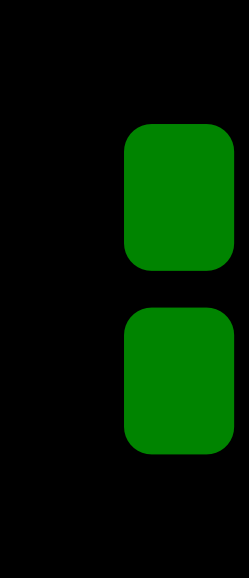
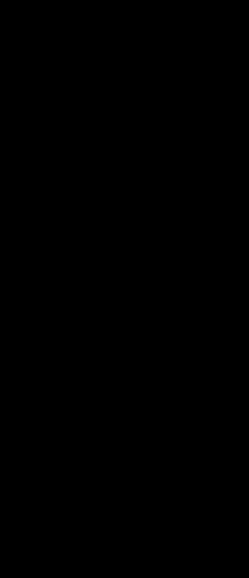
part: (179, 197) -> none
part: (179, 380) -> none

